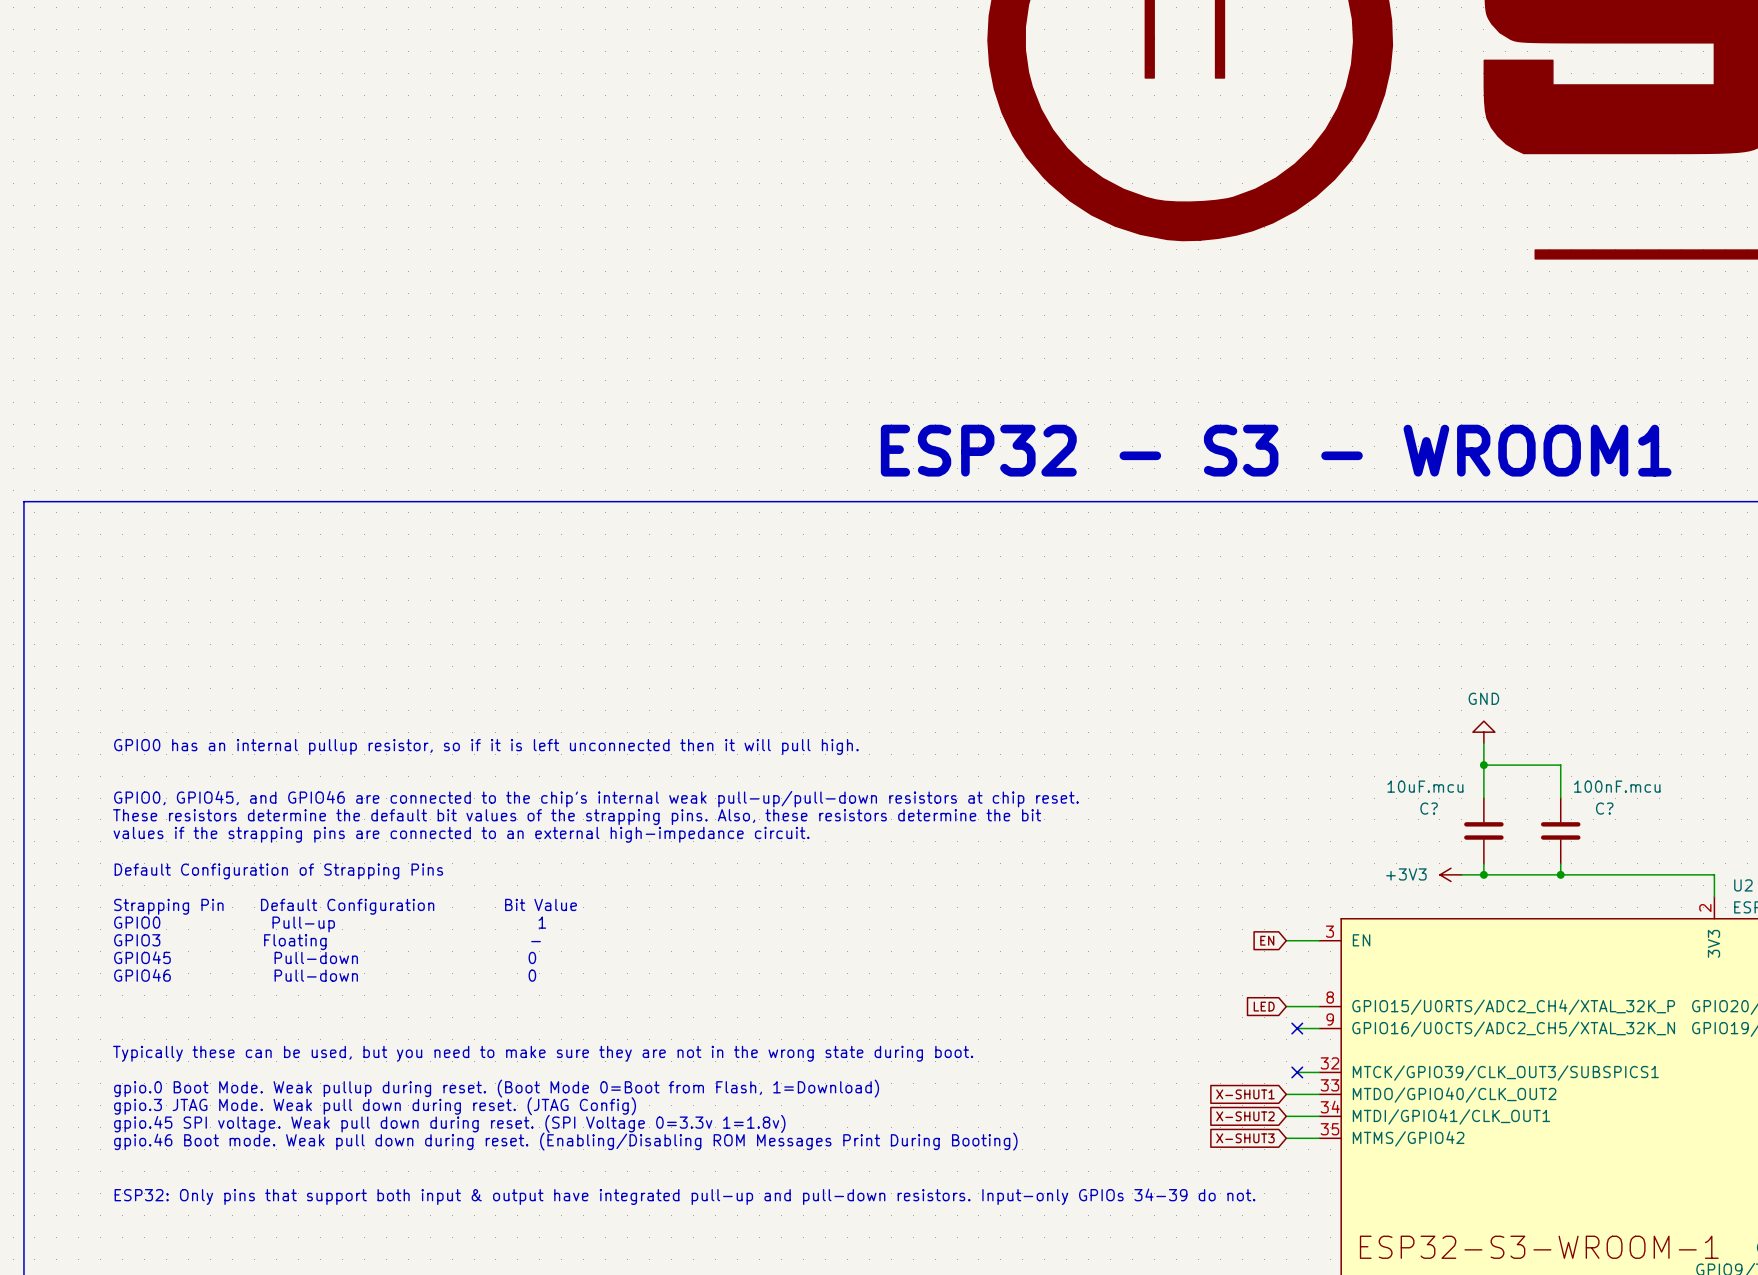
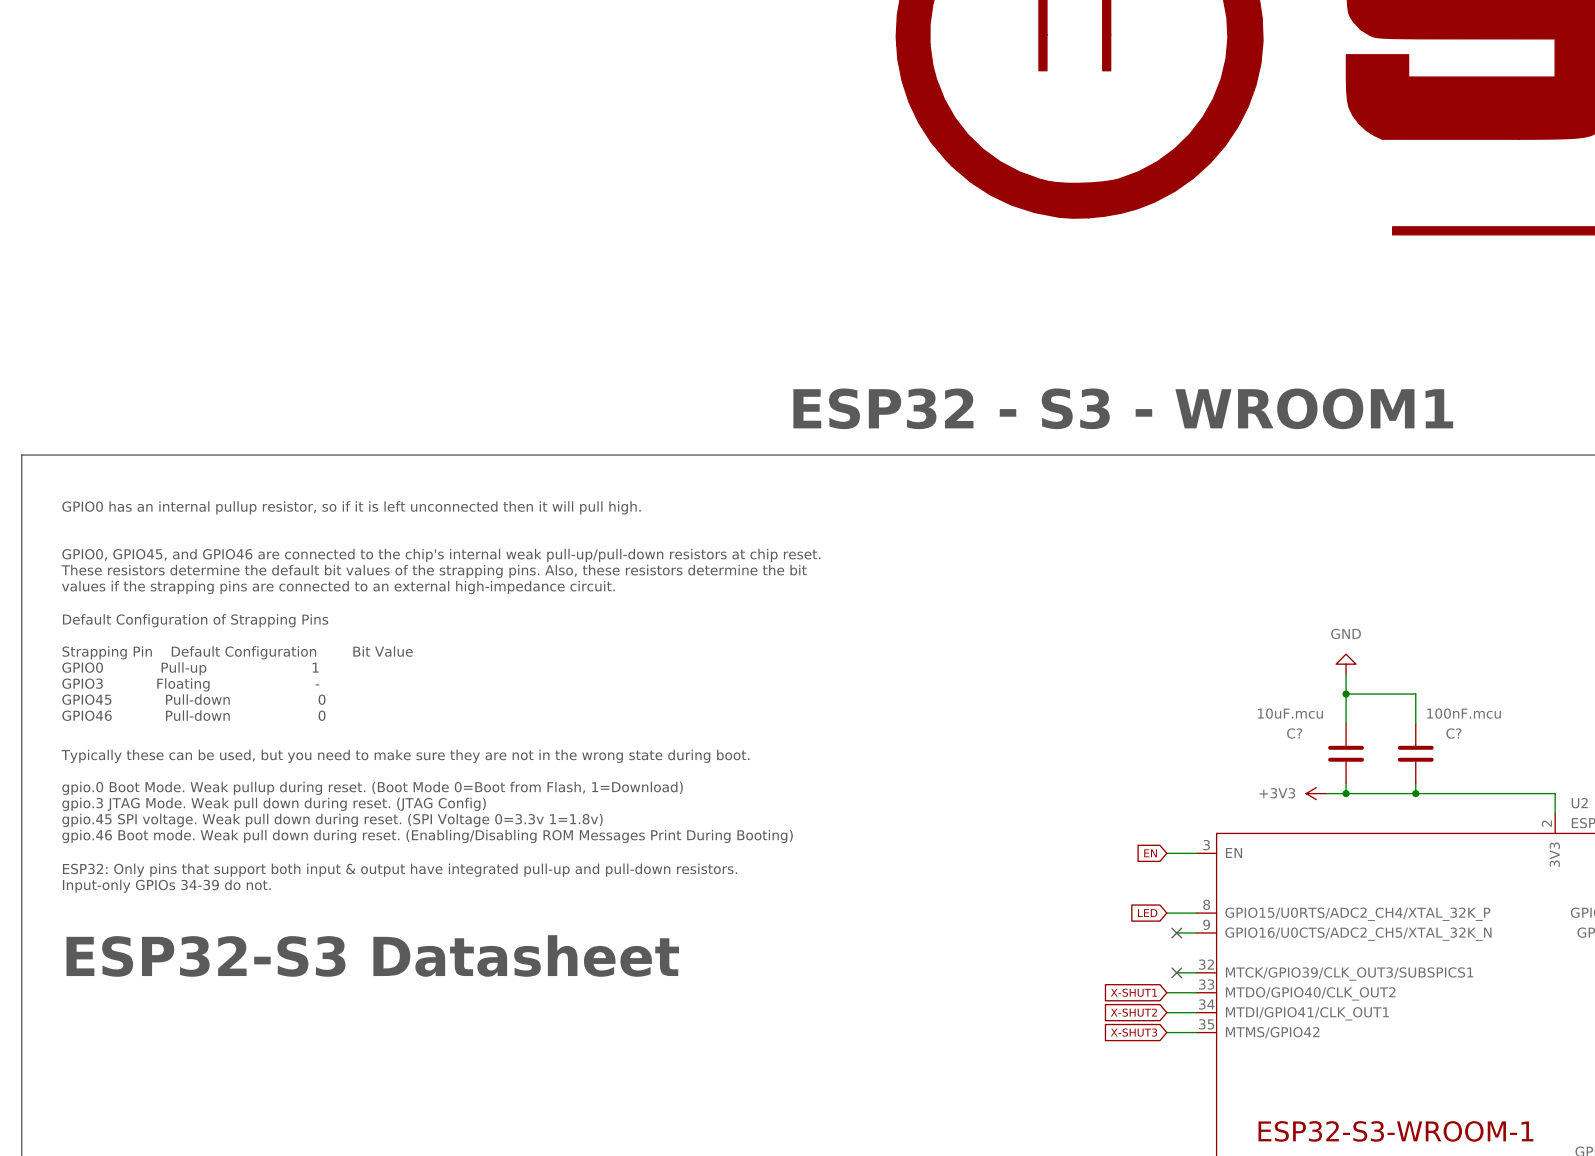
text position: GPIO0 has an internal pullup resistor, so if it is left unconnected then it will pull high. (486, 746) -> GPIO0 has an internal pullup resistor, so if it is left unconnected then it will pull high. (351, 507)
text position: GPIO0, GPIO45, and GPIO46 are connected to the chip's internal weak pull-up/pull-down resistors at chip reset. (596, 799) -> GPIO0, GPIO45, and GPIO46 are connected to the chip's internal weak pull-up/pull-down resistors at chip reset. (441, 555)
text position: These resistors determine the default bit values of the strapping pins. Also, these resistors determine the bit (577, 817) -> These resistors determine the default bit values of the strapping pins. Also, these resistors determine the bit (434, 571)
text position: values if the strapping pins are connected to an external high-impedance circuit. (461, 834) -> values if the strapping pins are connected to an external high-impedance circuit. (338, 587)
text: none -> Typically these can be used, but you need to make sure they are not in the wrong state during boot. (405, 756)
text: none -> gpio.0 Boot Mode. Weak pullup during reset. (Boot Mode 0=Boot from Flash, 1=Download) (372, 788)
text position: Default Configuration of Strapping Pins (278, 871) -> Default Configuration of Strapping Pins (195, 620)
text: none -> gpio.3 JTAG Mode. Weak pull down during reset. (JTAG Config) (274, 804)
text: none -> gpio.45 SPI voltage. Weak pull down during reset. (SPI Voltage 0=3.3v 1=1.8v) (332, 820)
text position: Strapping Pin Default Configuration Bit Value (345, 906) -> Strapping Pin Default Configuration Bit Value (237, 652)
text: none -> gpio.46 Boot mode. Weak pull down during reset. (Enabling/Disabling ROM Messages Print During Booting) (427, 836)
text position: GPIO0 Pull-up 1 (330, 924) -> GPIO0 Pull-up 1 (190, 668)
text position: GPIO3 Floating - (327, 942) -> GPIO3 Floating - (190, 684)
text position: GPIO45 Pull-down 0 (325, 957) -> GPIO45 Pull-down 0 (193, 699)
text: none -> ESP32: Only pins that support both input & output have integrated pull-up and pull-down resistors. (400, 870)
text position: GPIO46 Pull-down 0 (325, 975) -> GPIO46 Pull-down 0 (193, 715)
text: none -> Input-only GPIOs 34-39 do not. (166, 886)
text: Typically these can be used, but you need to make sure they are not in the wrong state during boot. (543, 1053) -> none
text: none -> ESP32-S3 Datasheet (372, 955)
text: gpio.0 Boot Mode. Weak pullup during reset. (Boot Mode 0=Boot from Flash, 1=Download) (496, 1088) -> none
text: gpio.3 JTAG Mode. Weak pull down during reset. (JTAG Config) (375, 1106) -> none
text: gpio.45 SPI voltage. Weak pull down during reset. (SPI Voltage 0=3.3v 1=1.8v) (449, 1123) -> none
text: gpio.46 Boot mode. Weak pull down during reset. (Enabling/Disabling ROM Messages Print During Booting) (565, 1141) -> none
text: ESP32: Only pins that support both input & output have integrated pull-up and pull-down resistors. Input-only GPIOs 34-39 do not. (685, 1196) -> none

